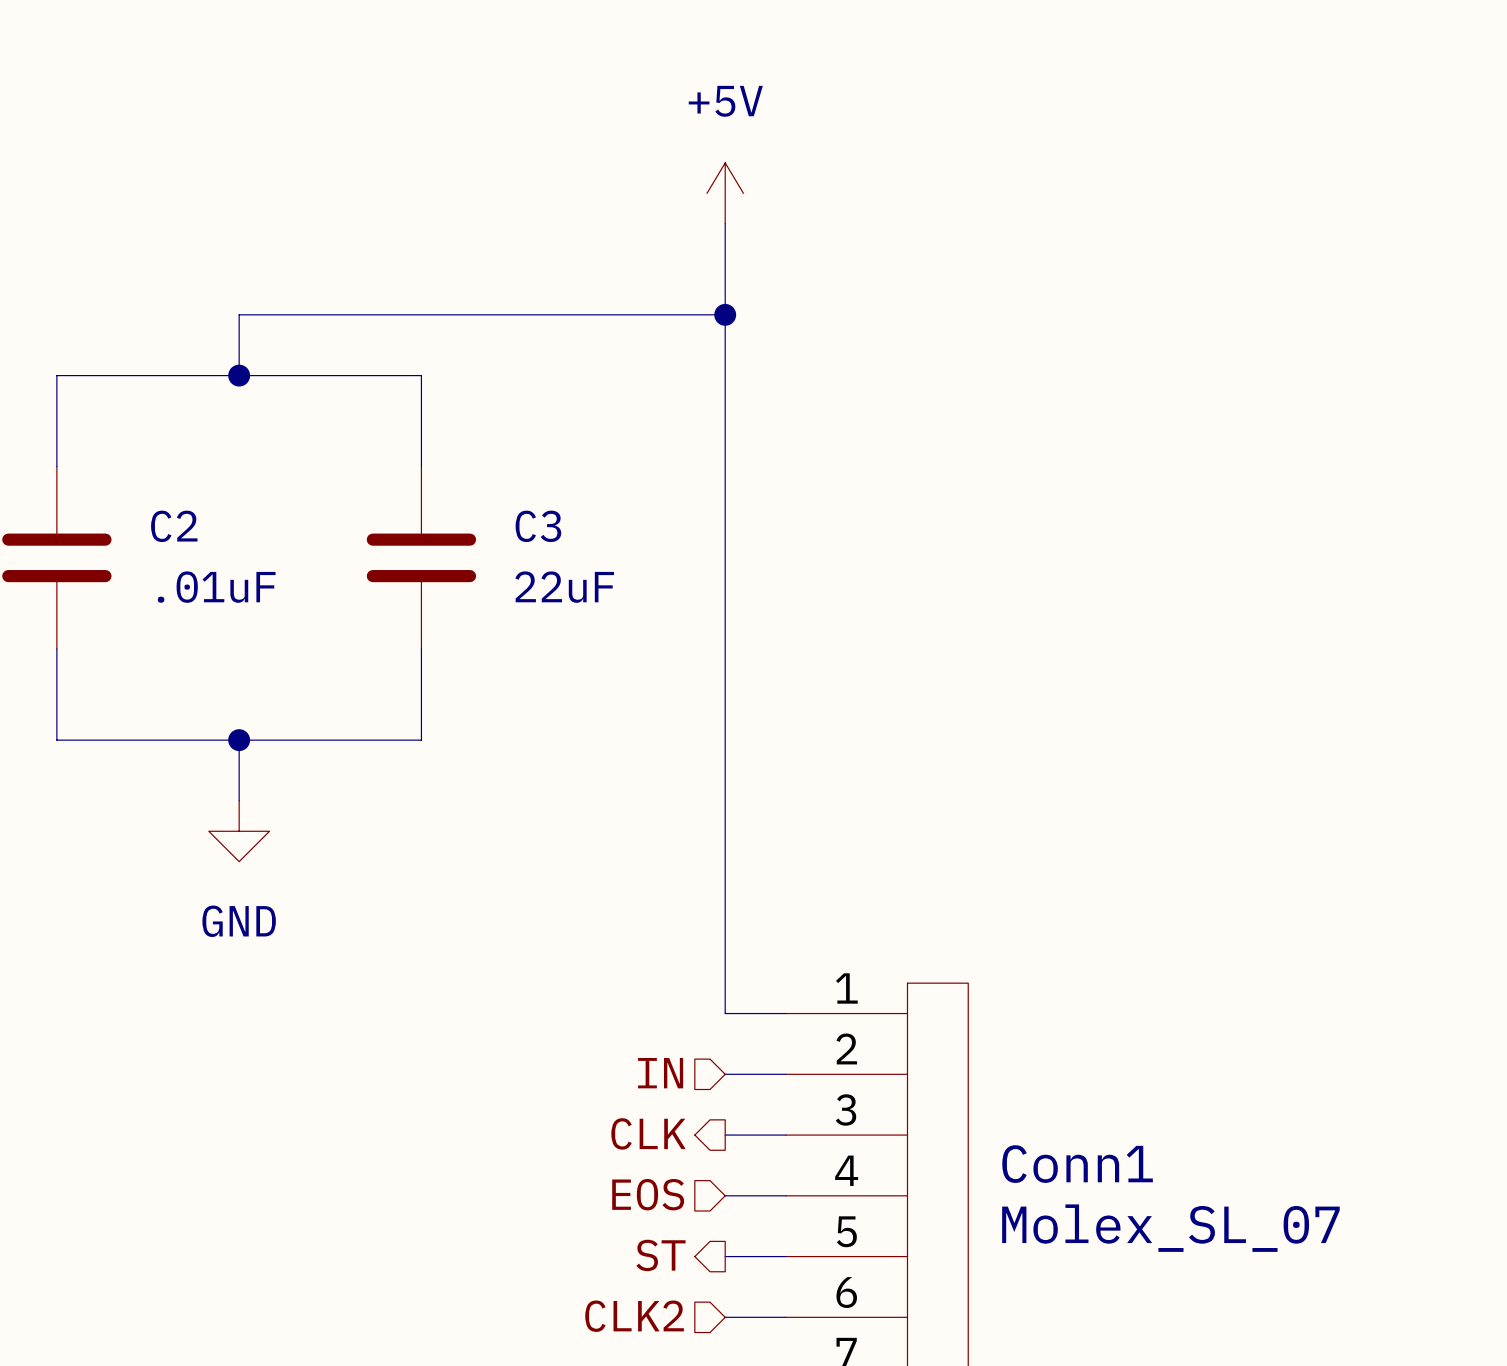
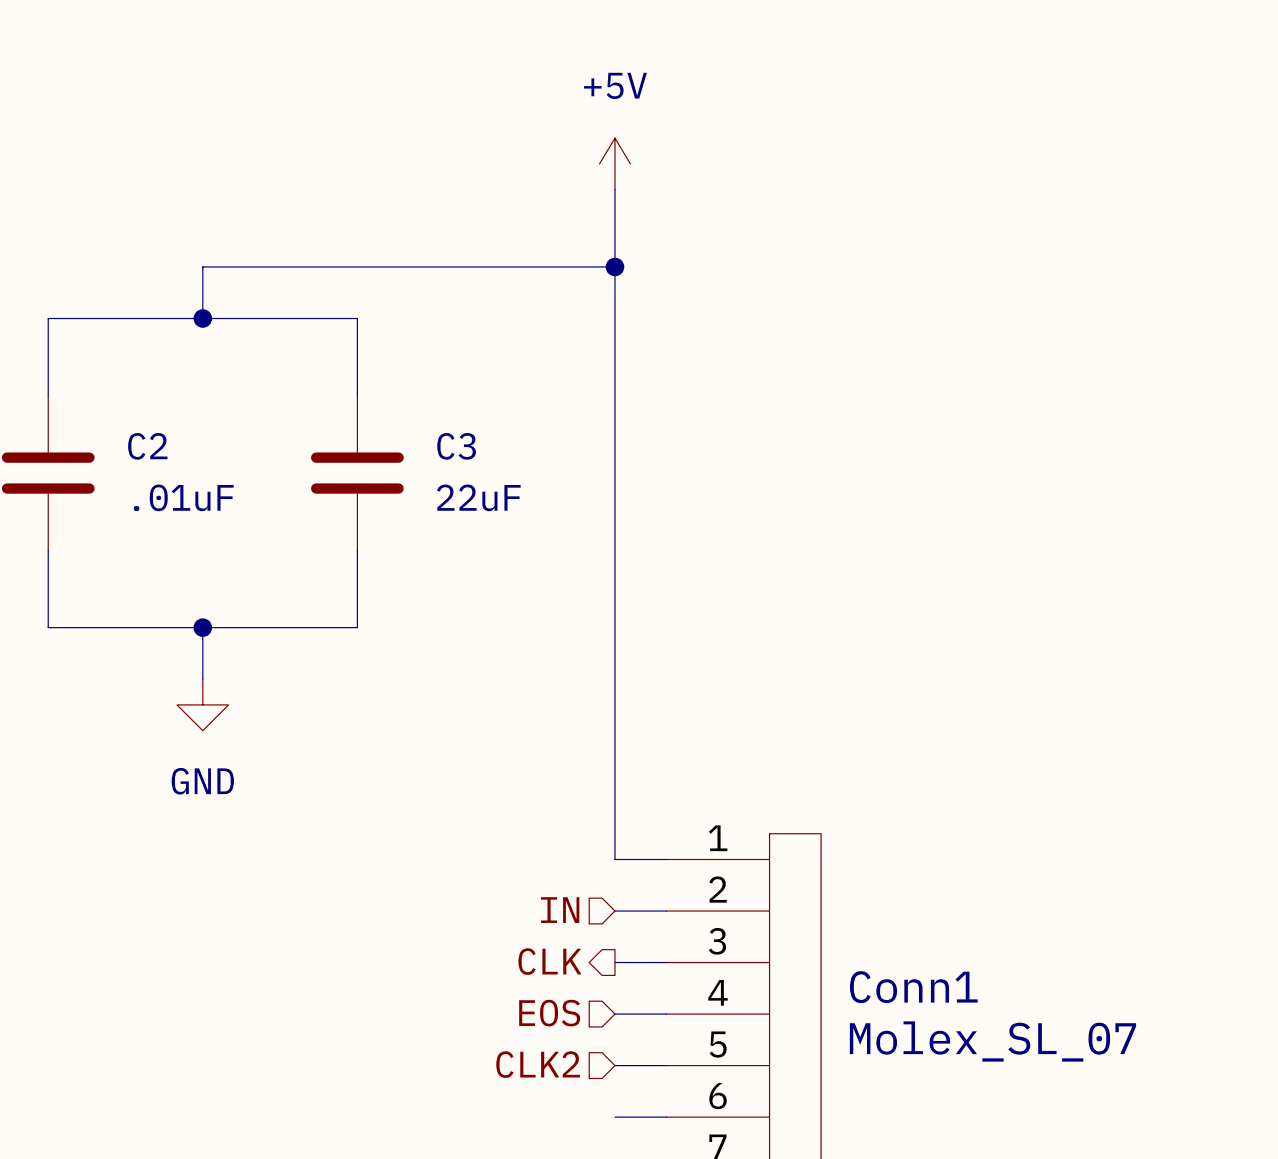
hierarchical label shape: output (660, 1255) -> input (538, 1064)
hierarchical label: ST (660, 1255) -> CLK2 (538, 1064)
hierarchical label: CLK2 (634, 1316) -> none

